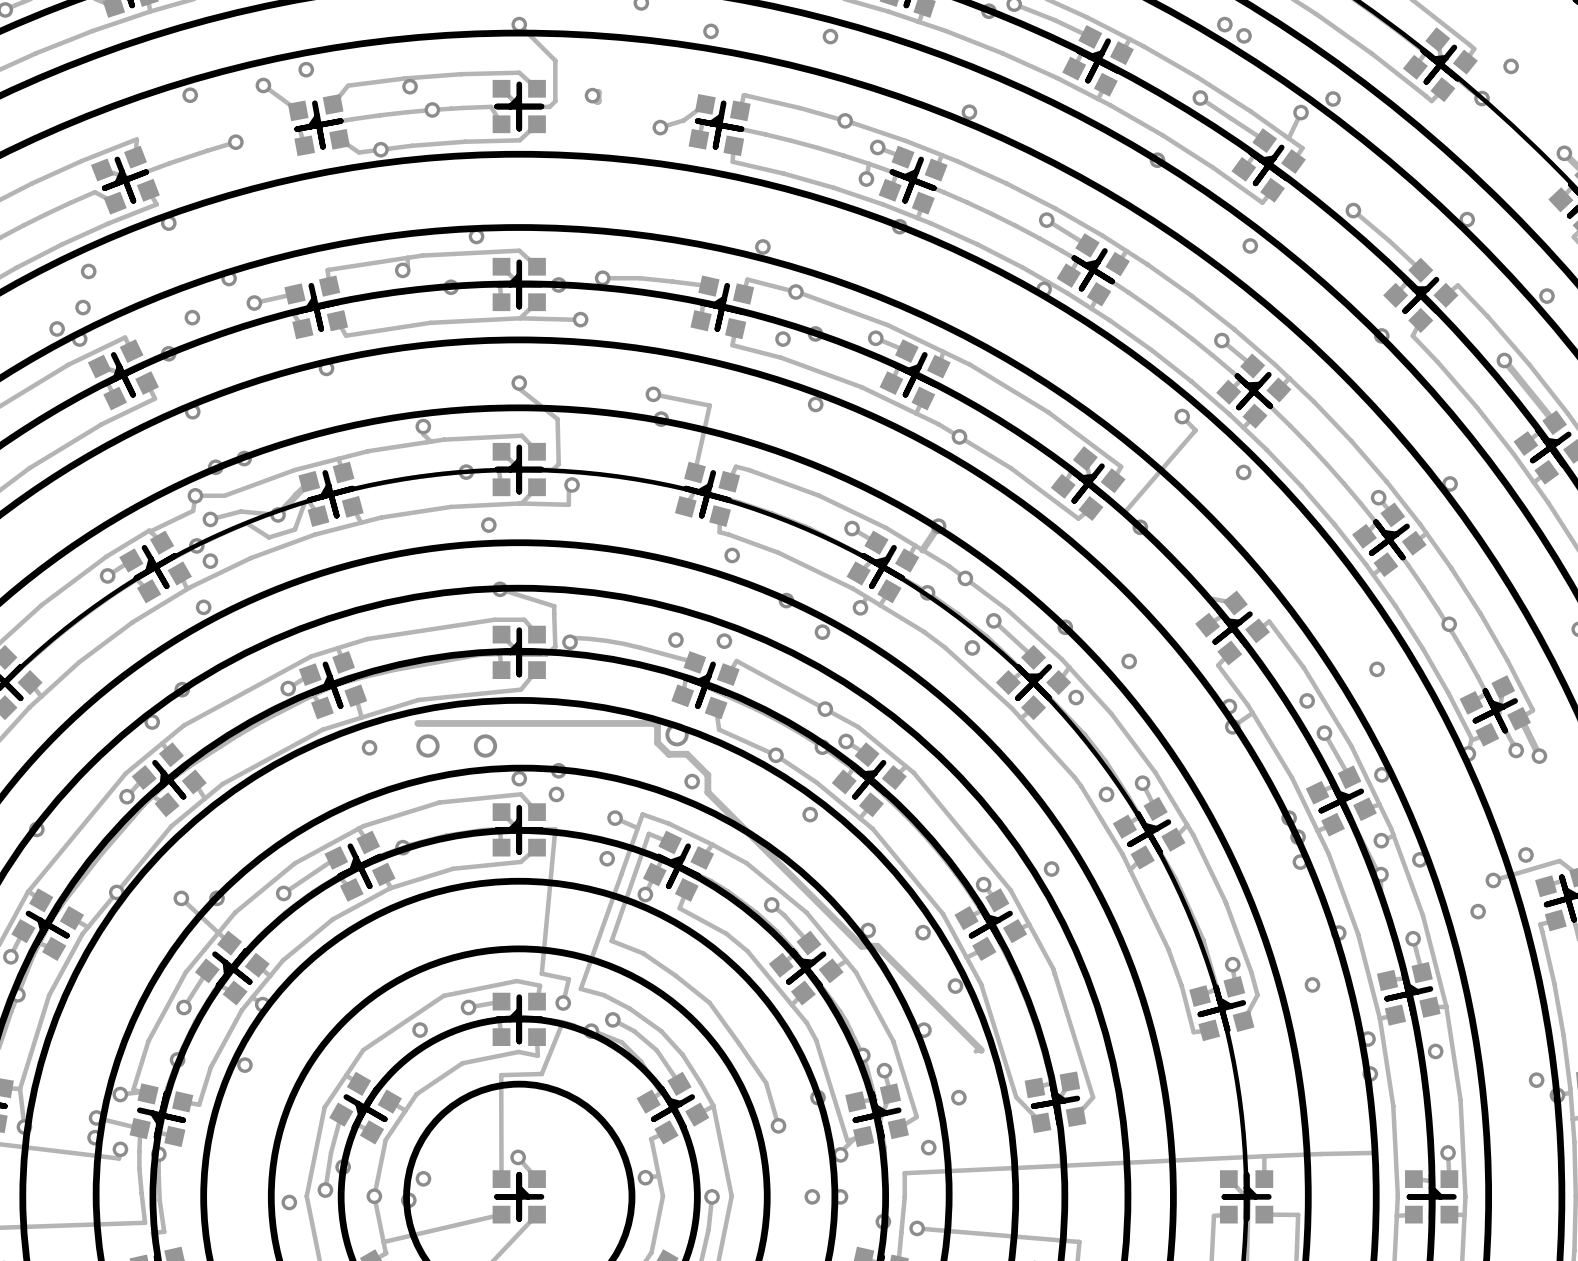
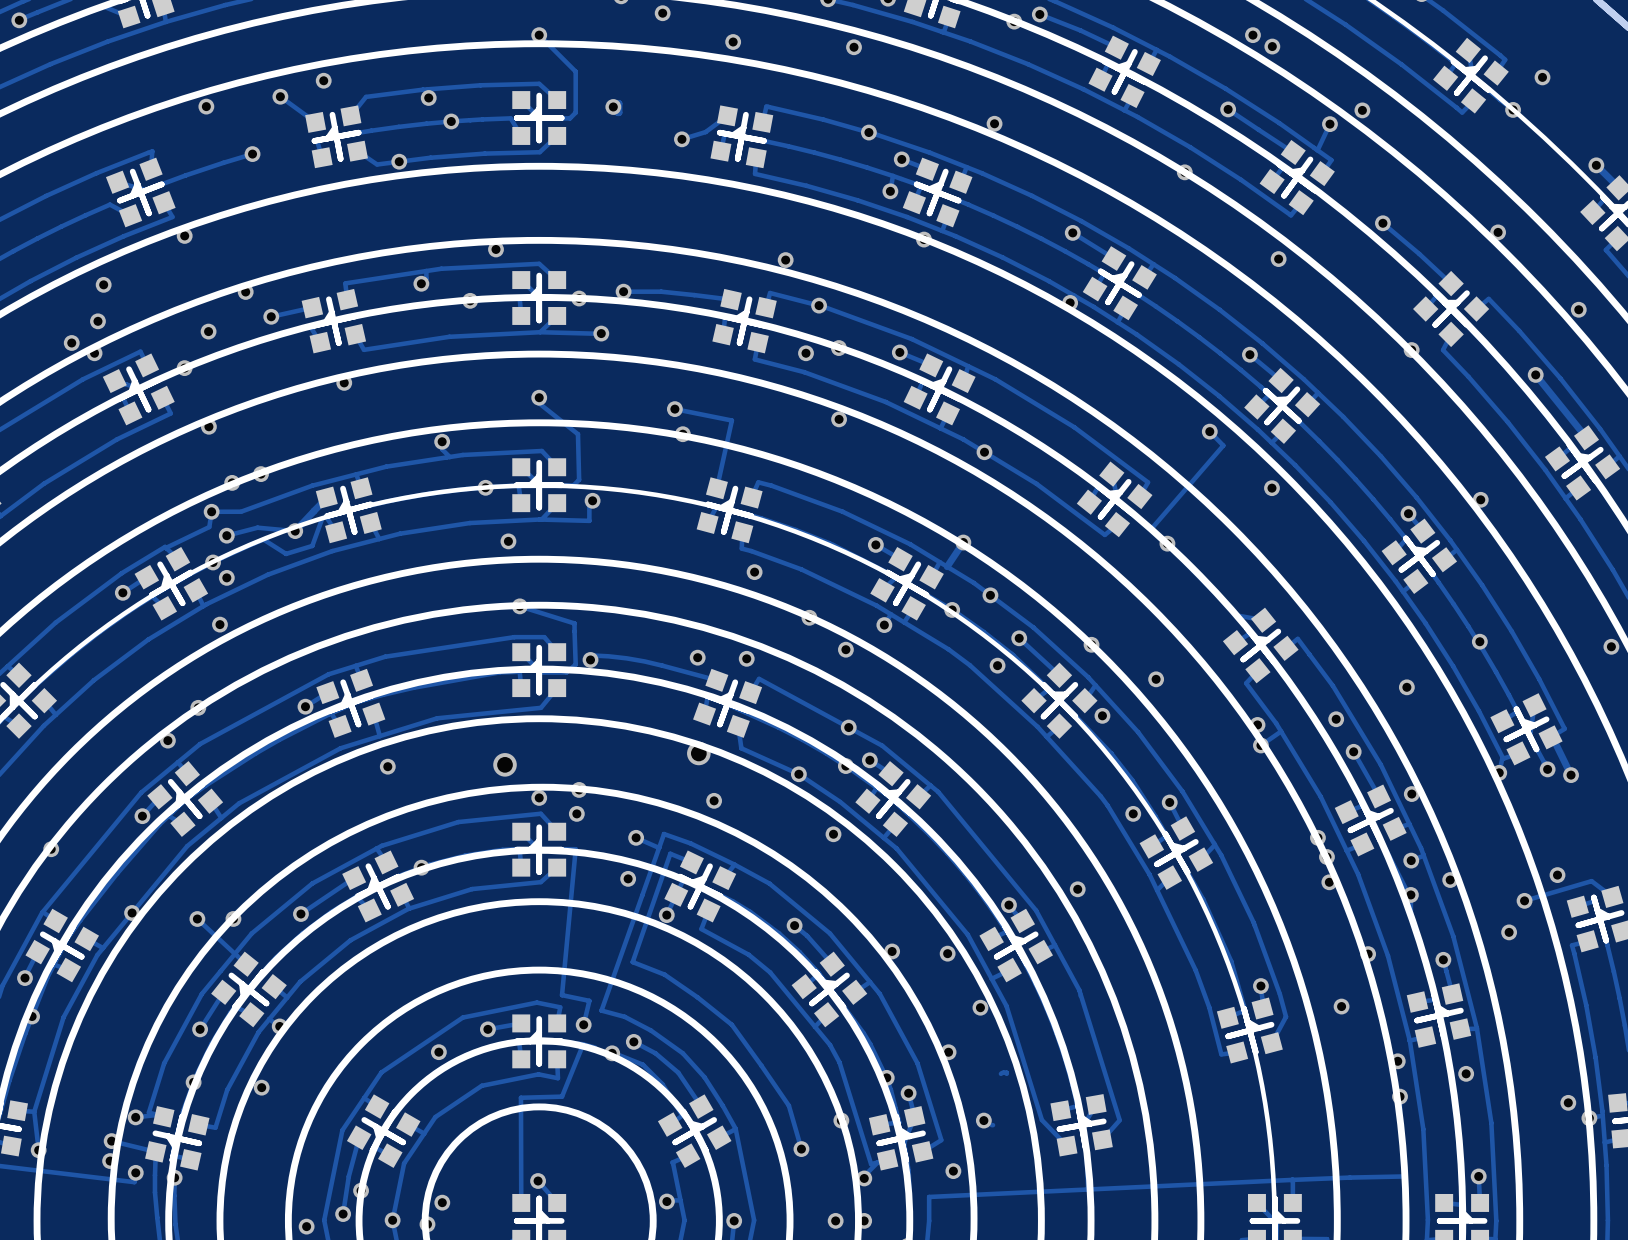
track: (417, 723) (654, 723) (657, 726) (657, 742) (668, 754) (687, 754) (707, 775) (707, 792) (861, 946) (877, 946) (981, 1050) -> none
via: (427, 746) -> none
track: none -> (991, 1125) (993, 1125)

